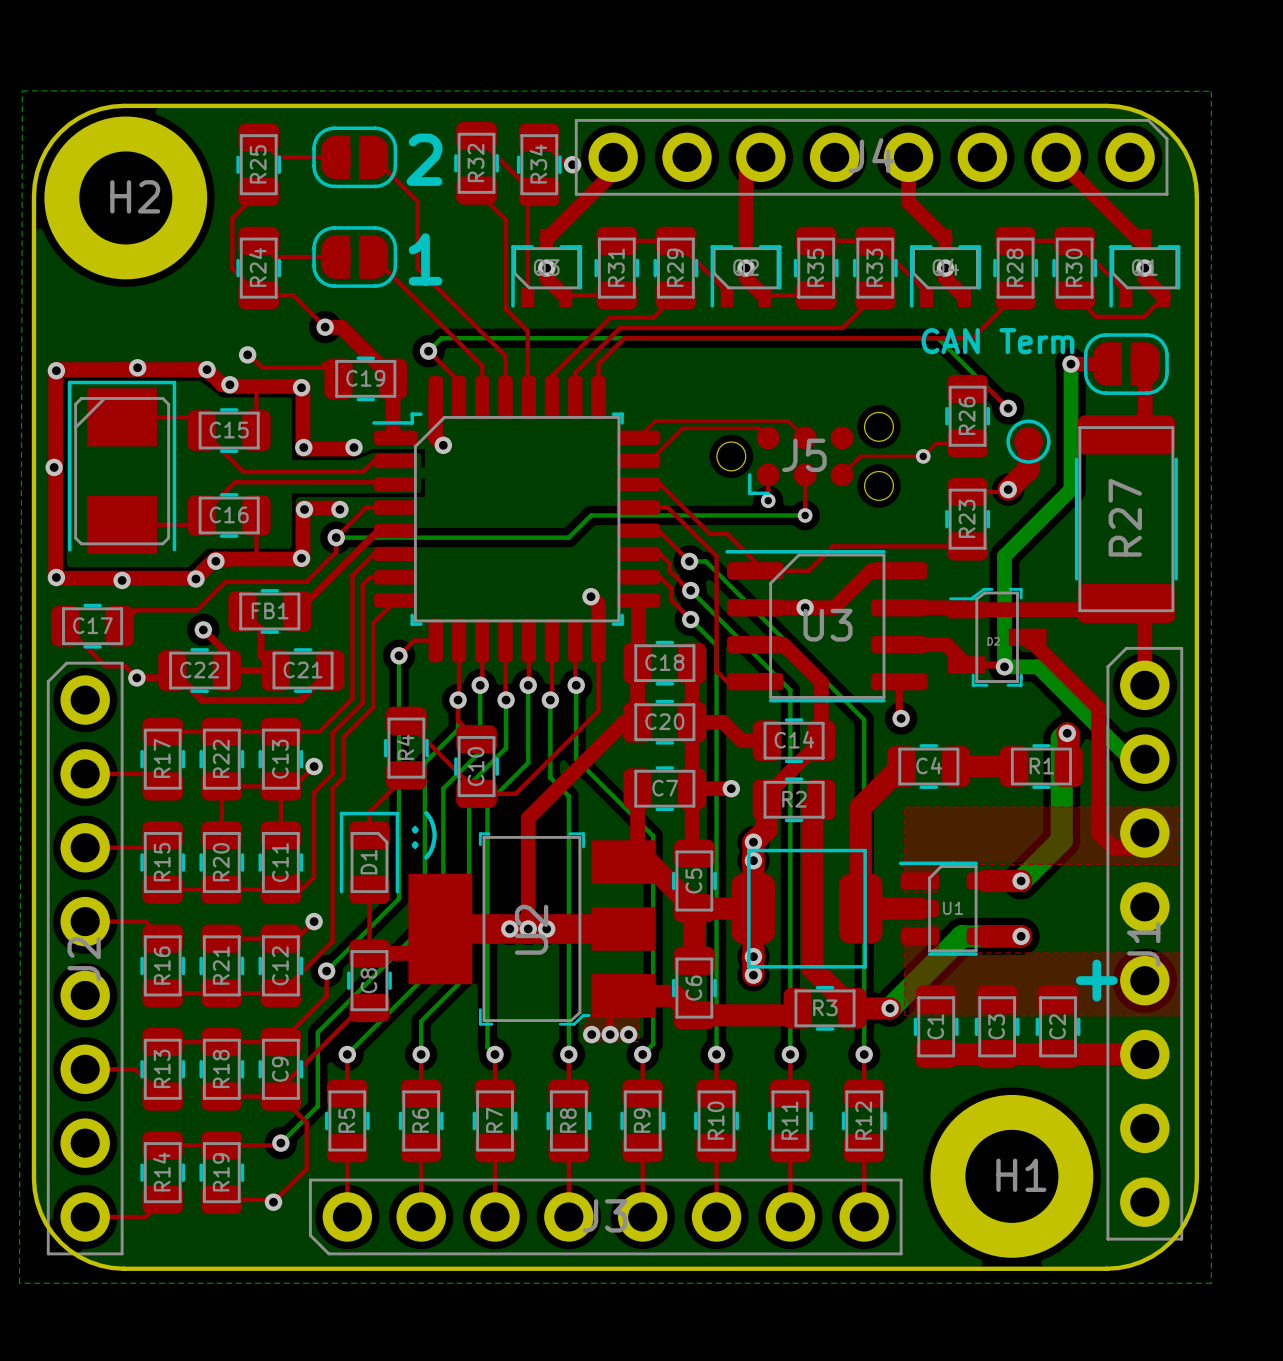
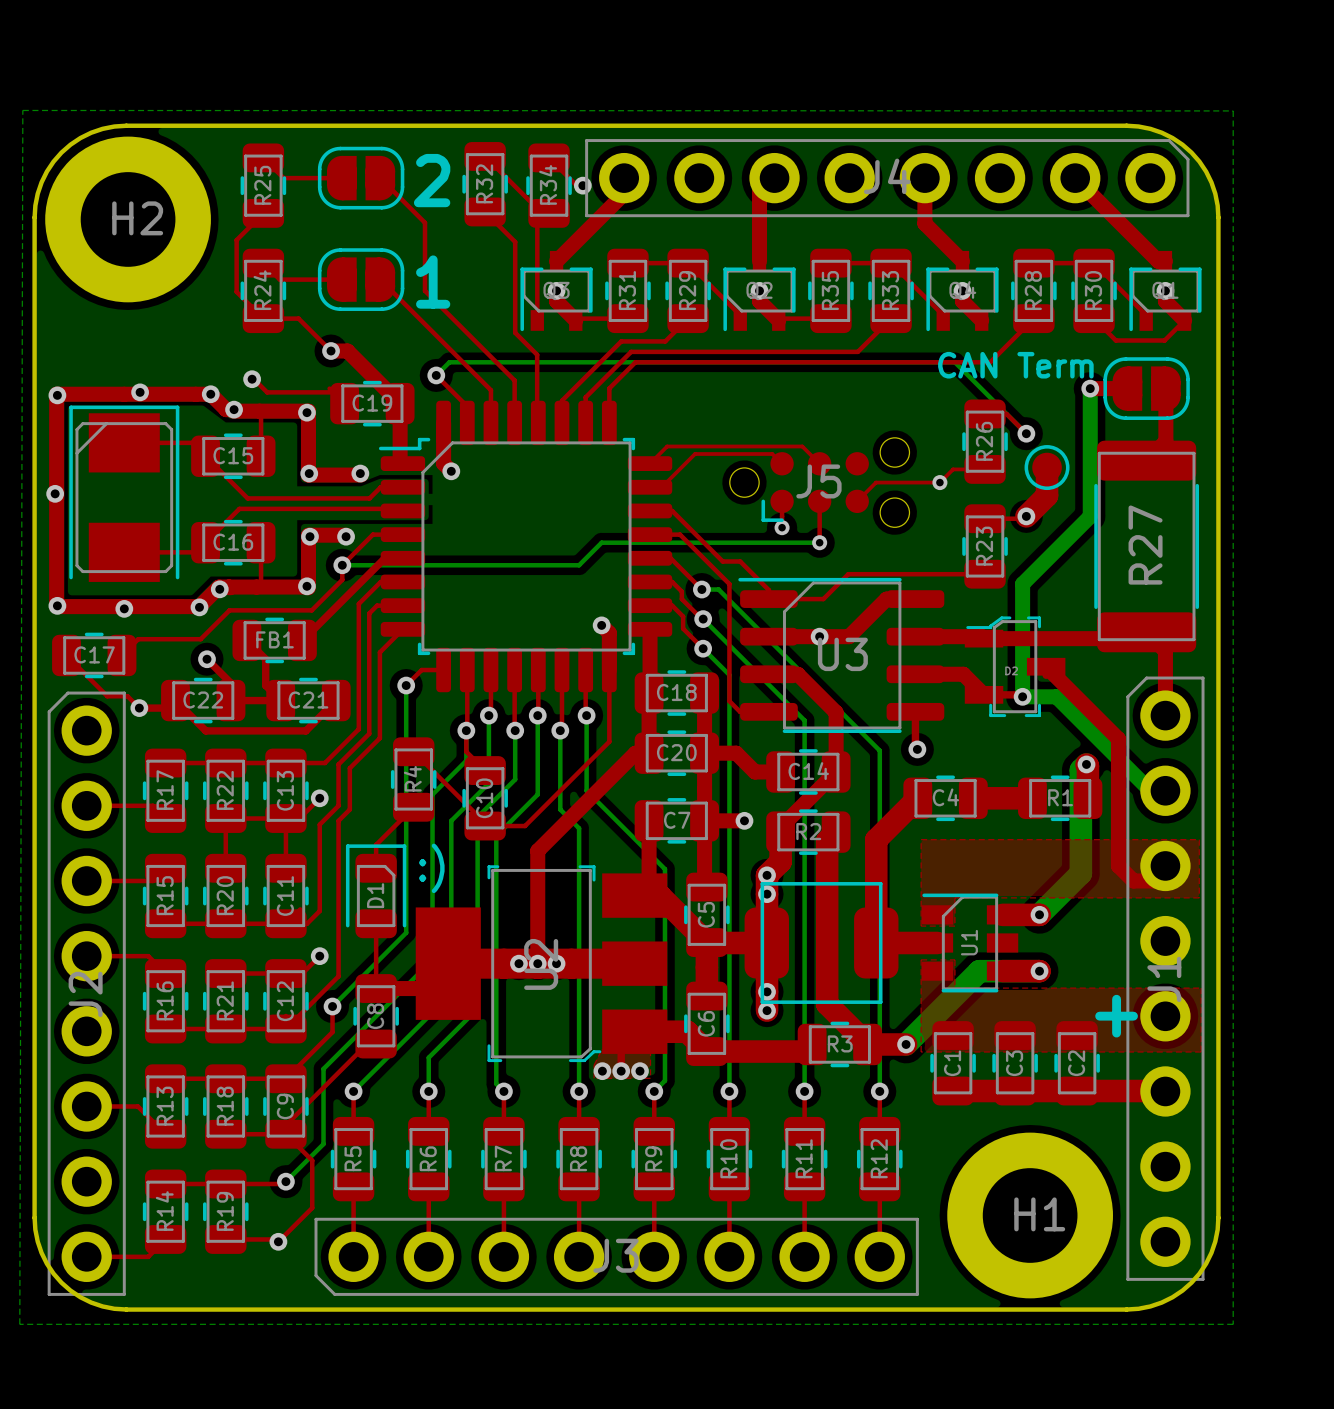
U1 footprint: [898, 861, 1006, 956] -> [921, 893, 1019, 993]
U1 name rotation: 0° (953, 908) -> 90° counterclockwise (969, 942)

